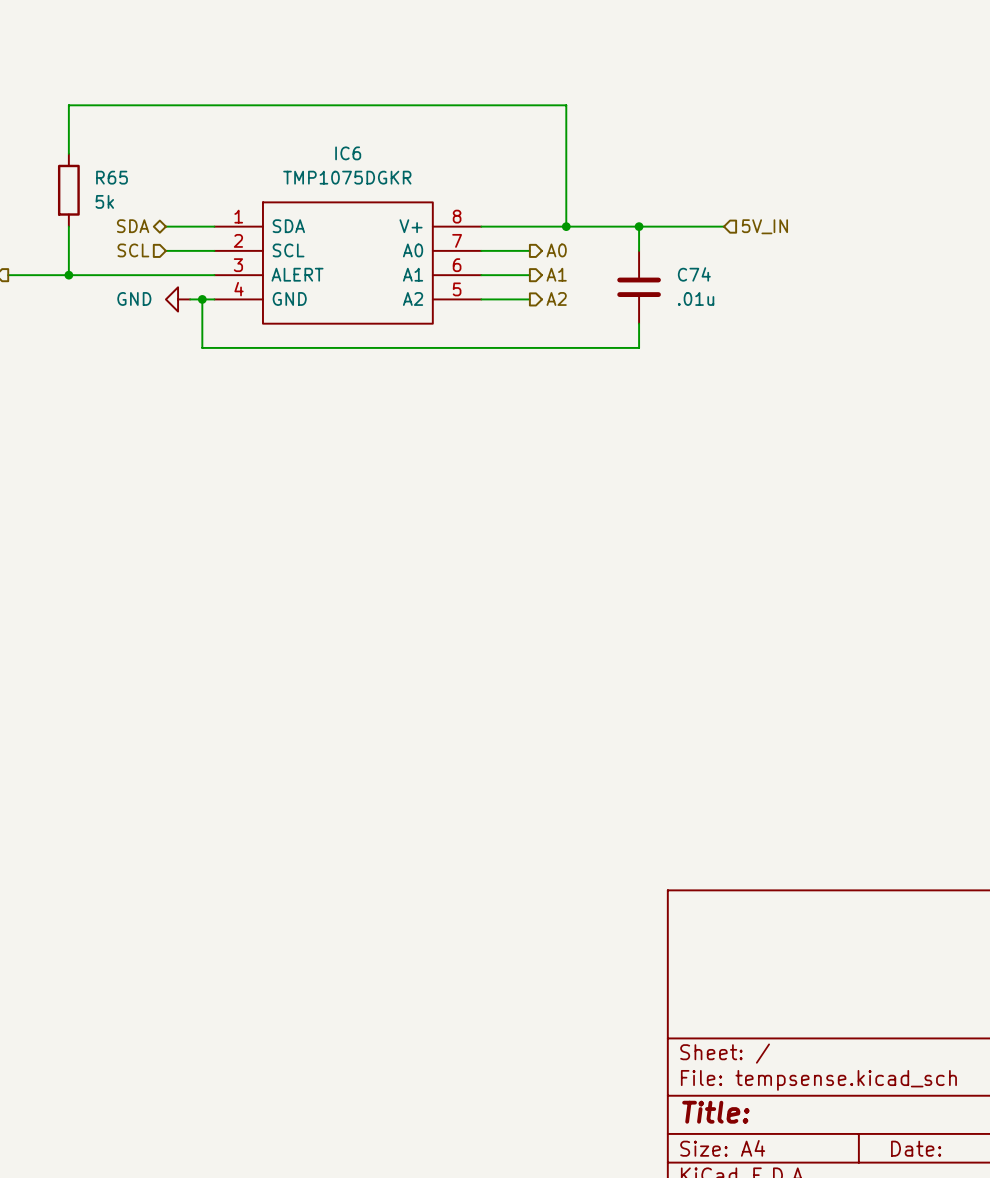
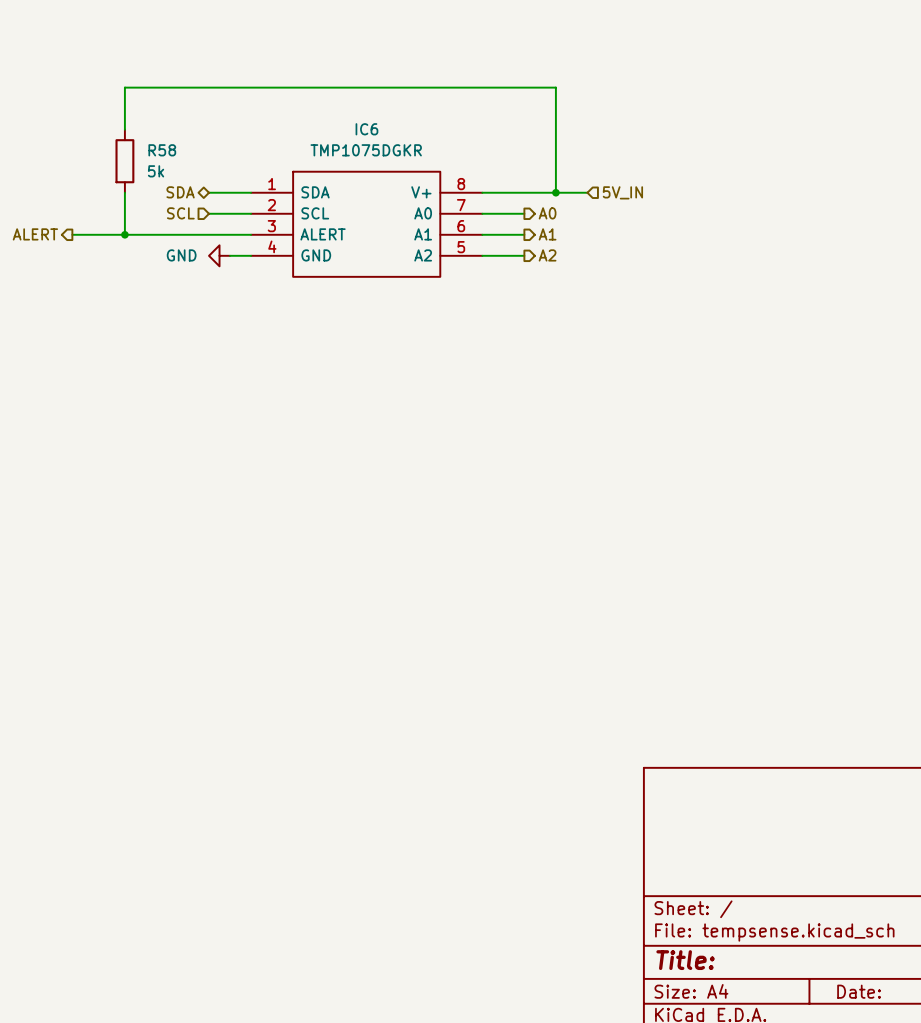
R65 name: R65 (112, 177) -> R58 (162, 150)
wire: (602, 226) (724, 226) -> none
wire: (639, 226) (639, 250) -> none
junction: (639, 226) -> none
hierarchical label position: 5V_IN (764, 226) -> 5V_IN (622, 192)
C74: .01u (639, 287) -> none
wire: (202, 299) (202, 347) (639, 347) (639, 323) -> none
junction: (202, 299) -> none

